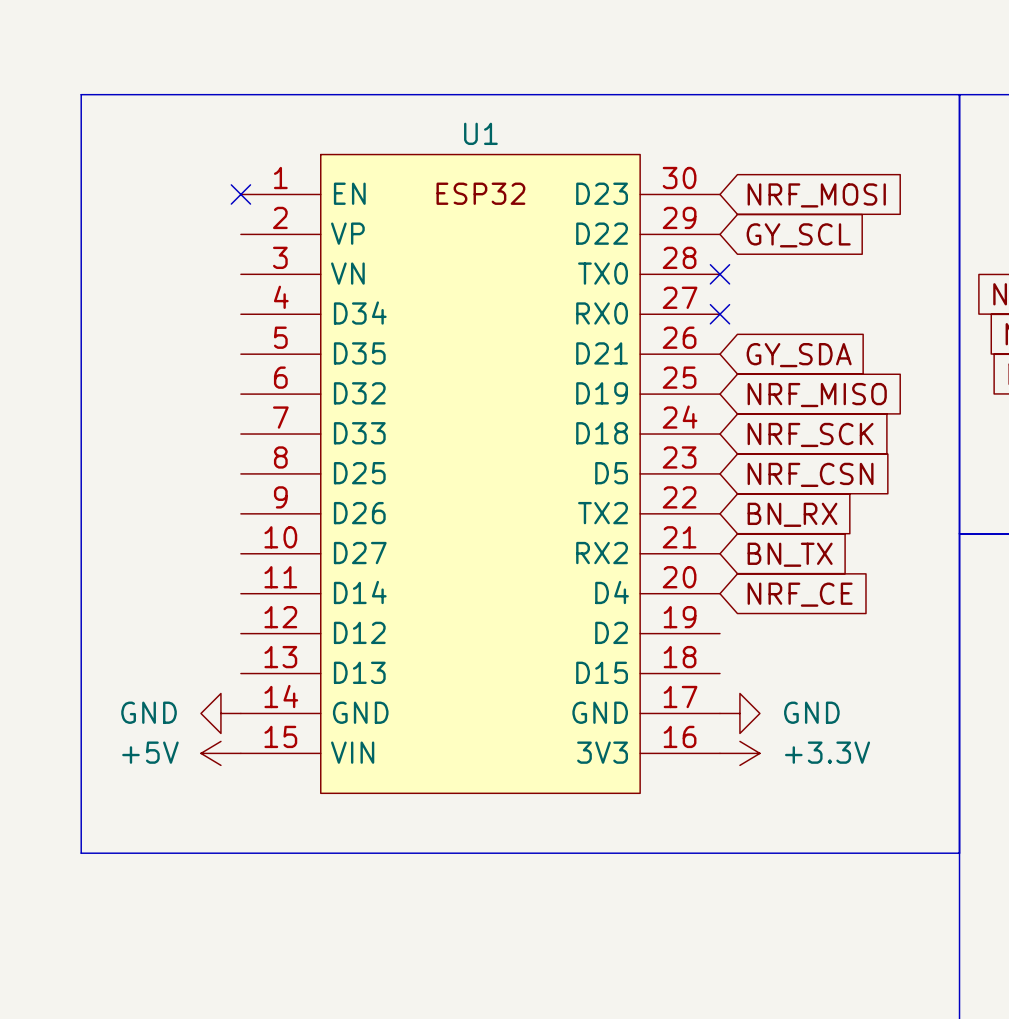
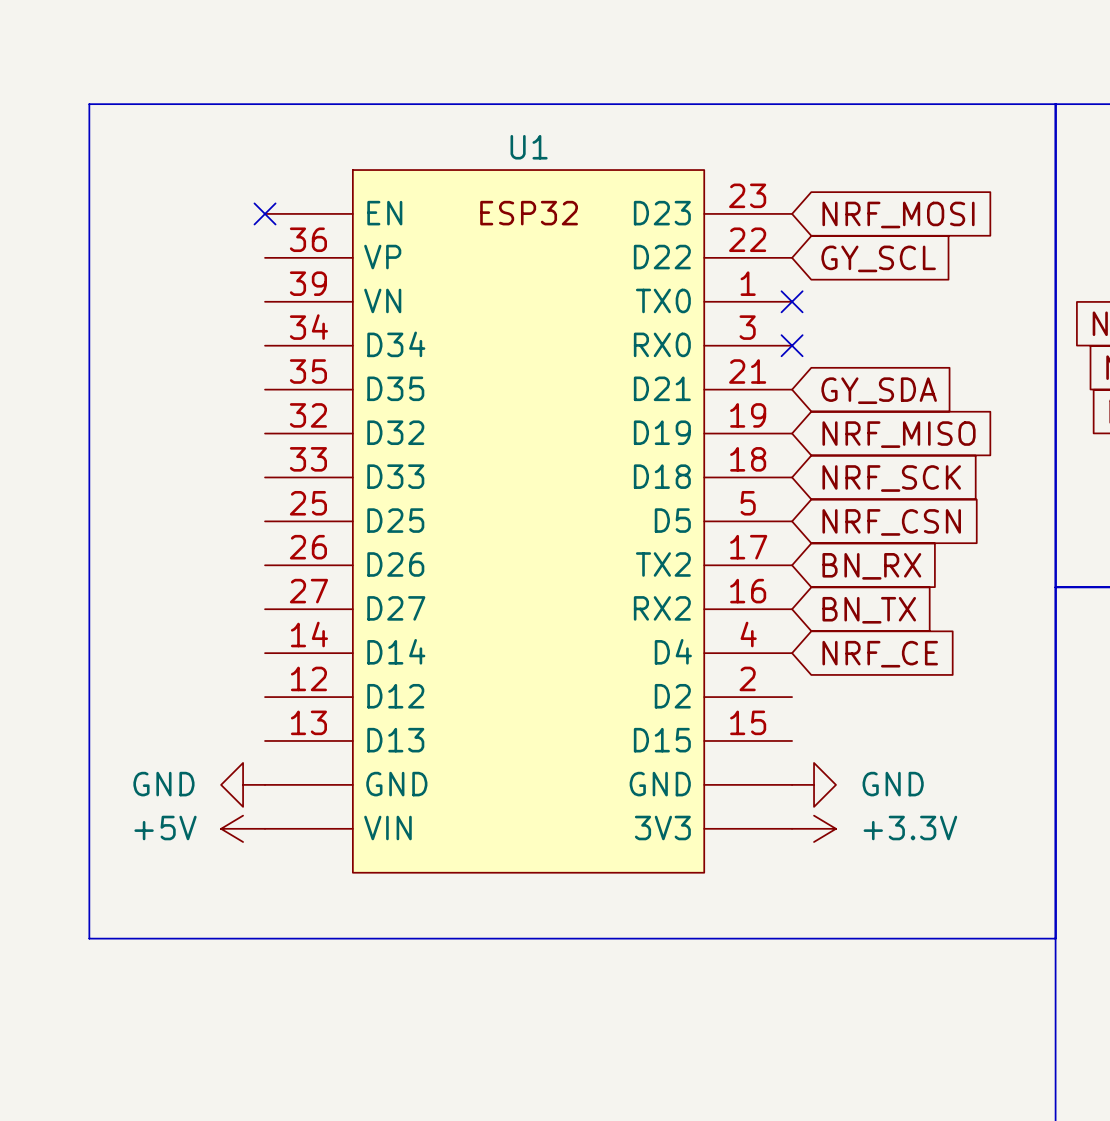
U1 symbol: [240, 154, 720, 794] -> [265, 170, 793, 873]

